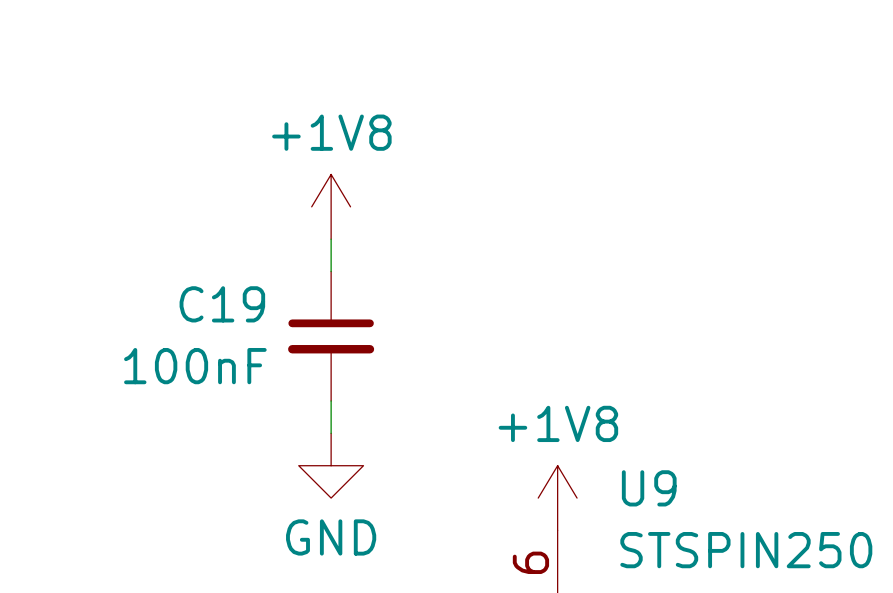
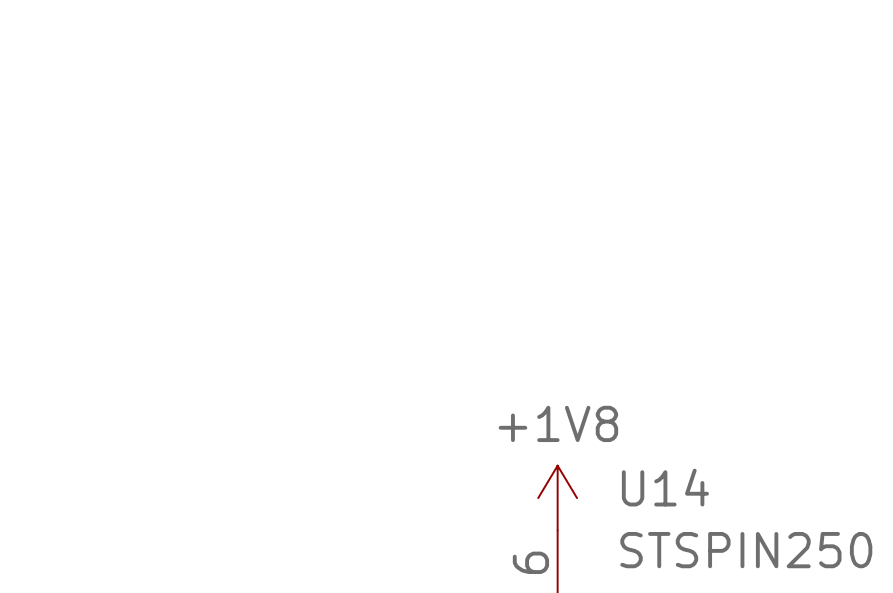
power symbol: +1V8 (331, 206) -> none
wire: (331, 239) (331, 271) -> none
C19: 100nF (331, 336) -> none
wire: (331, 401) (331, 433) -> none
power symbol: GND (331, 465) -> none
U9 name: U9 (649, 488) -> U14 (665, 487)

